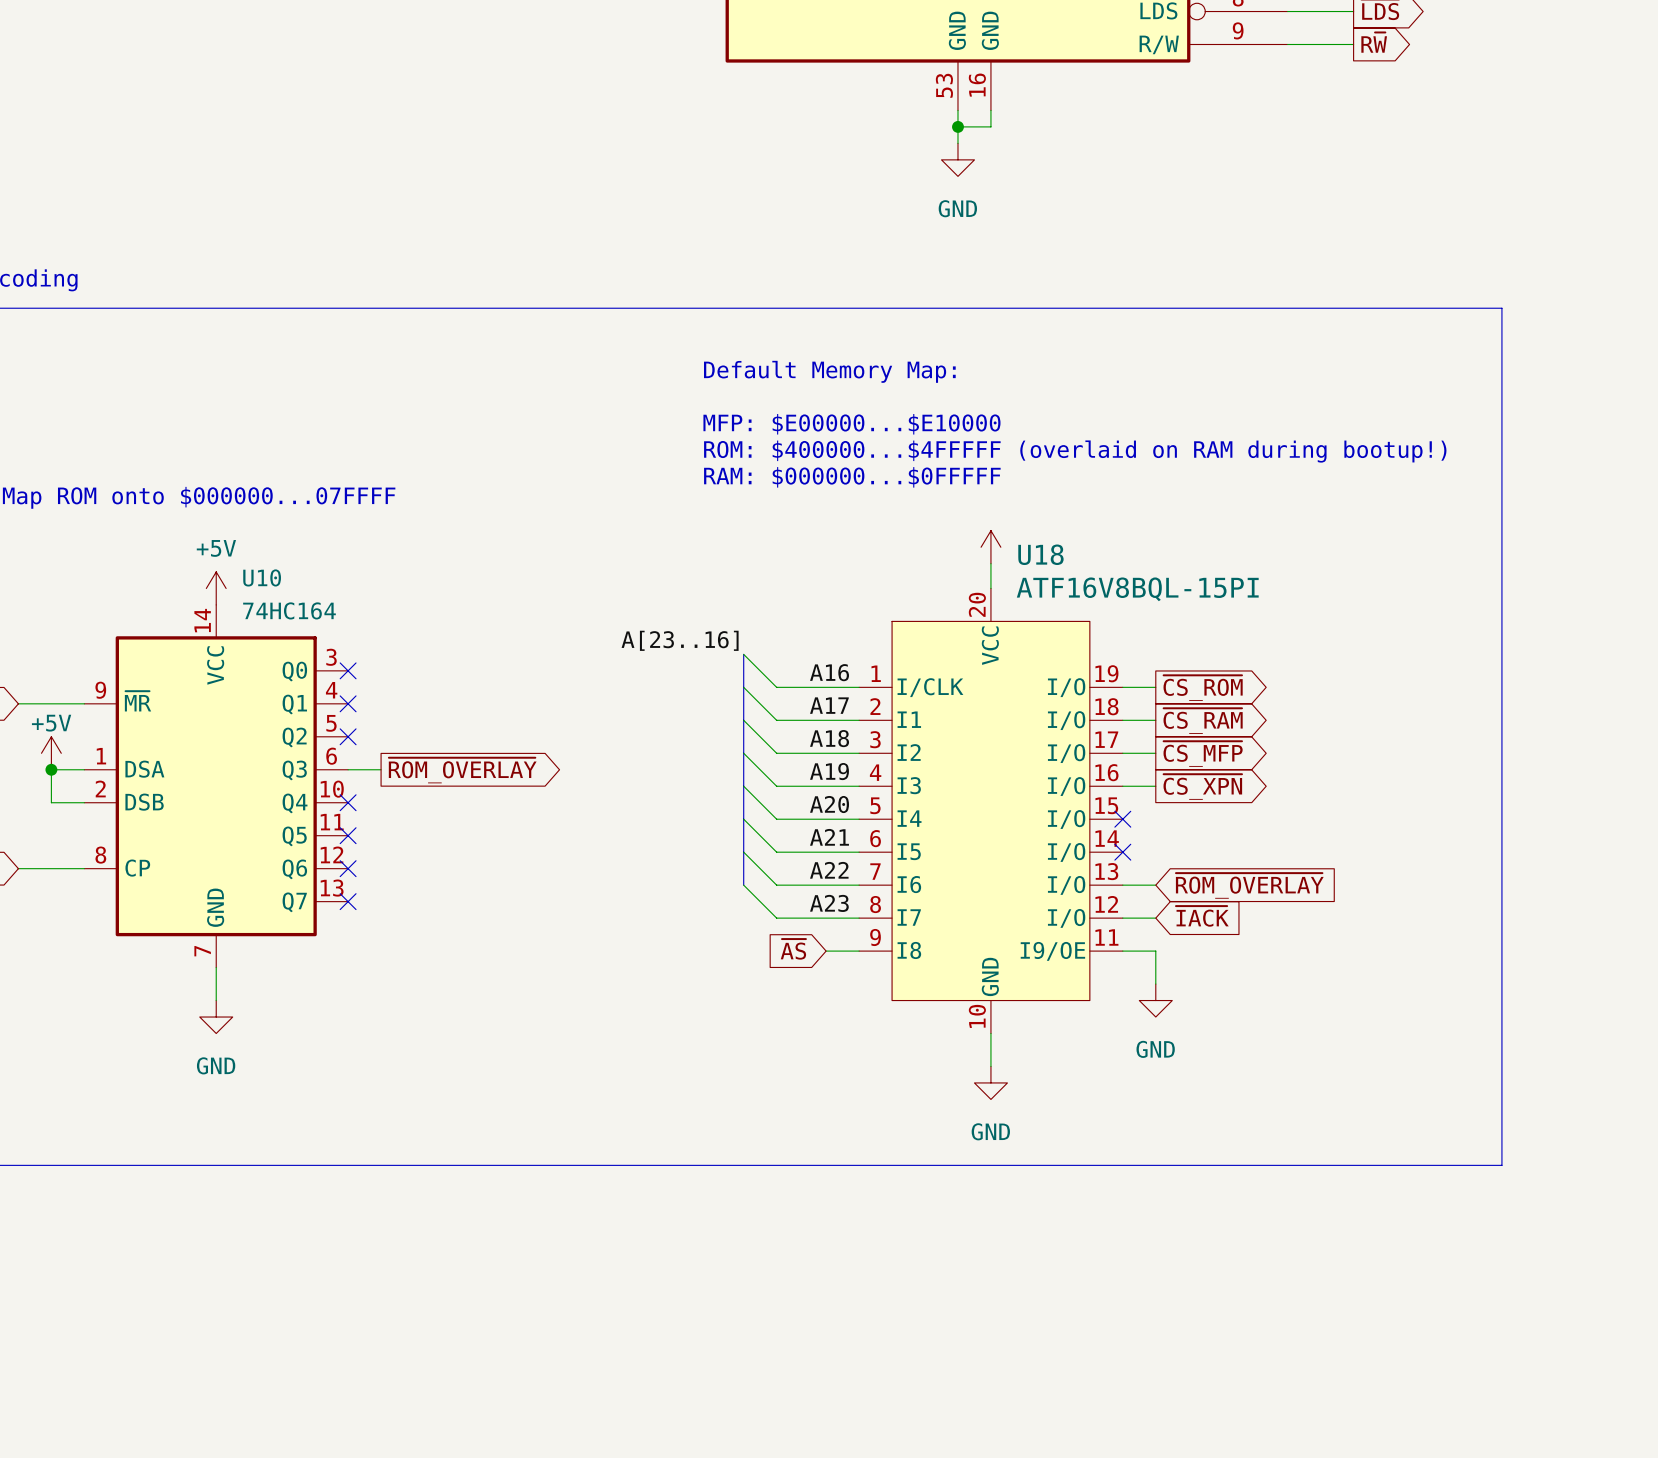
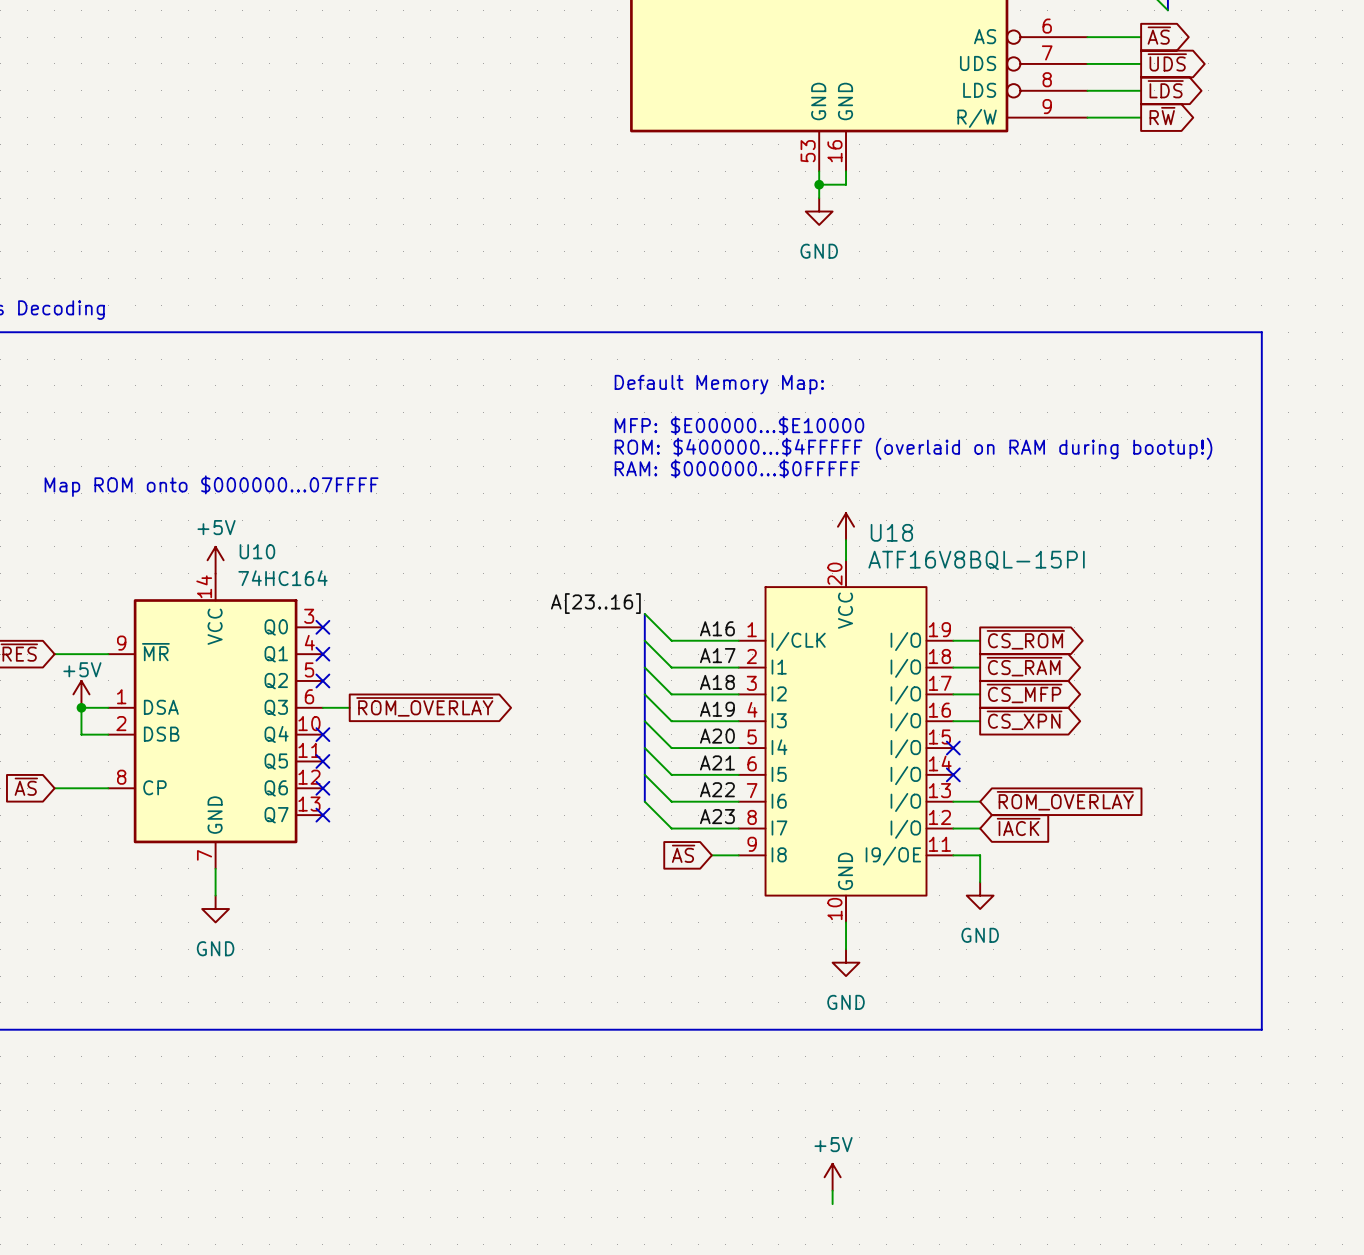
power symbol: none -> +5V (832, 1177)
wire: none -> (832, 1190) (832, 1204)

